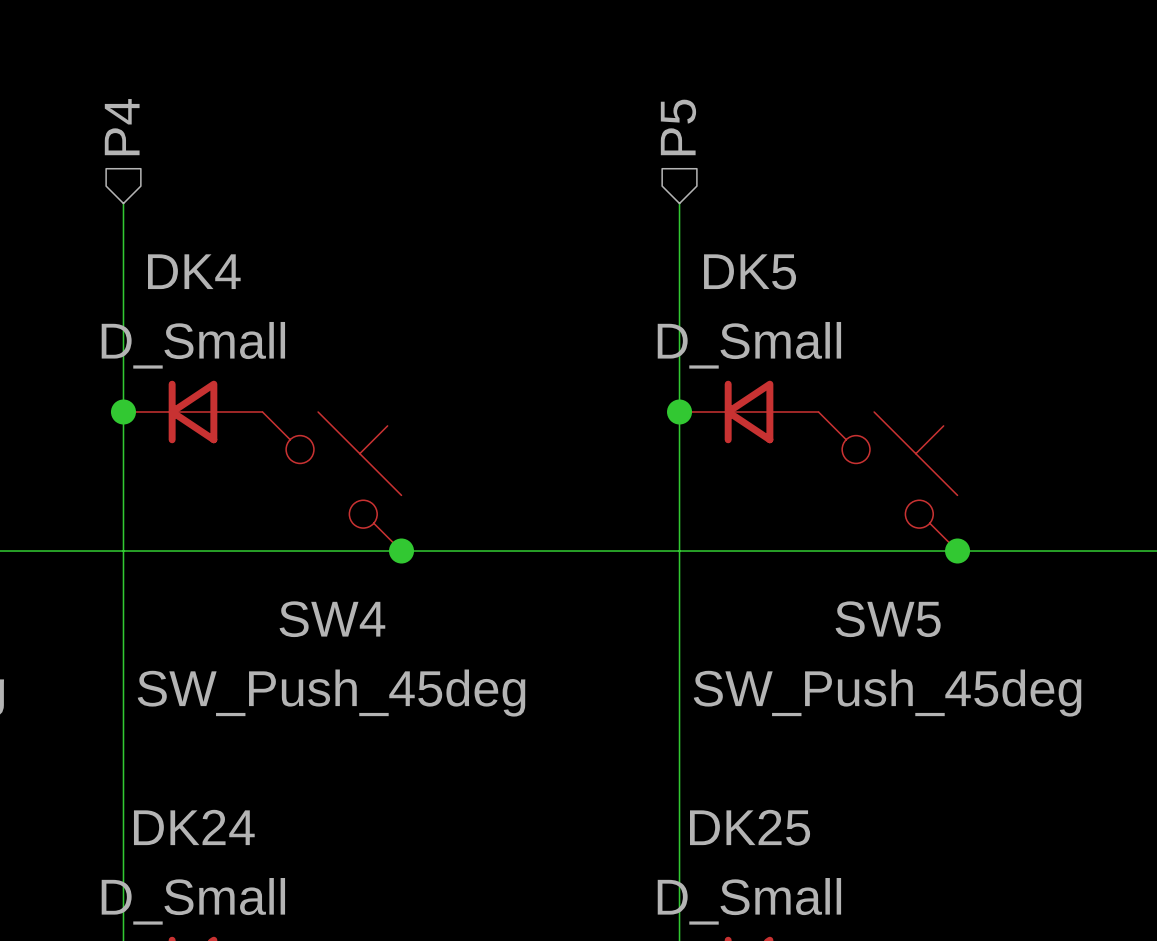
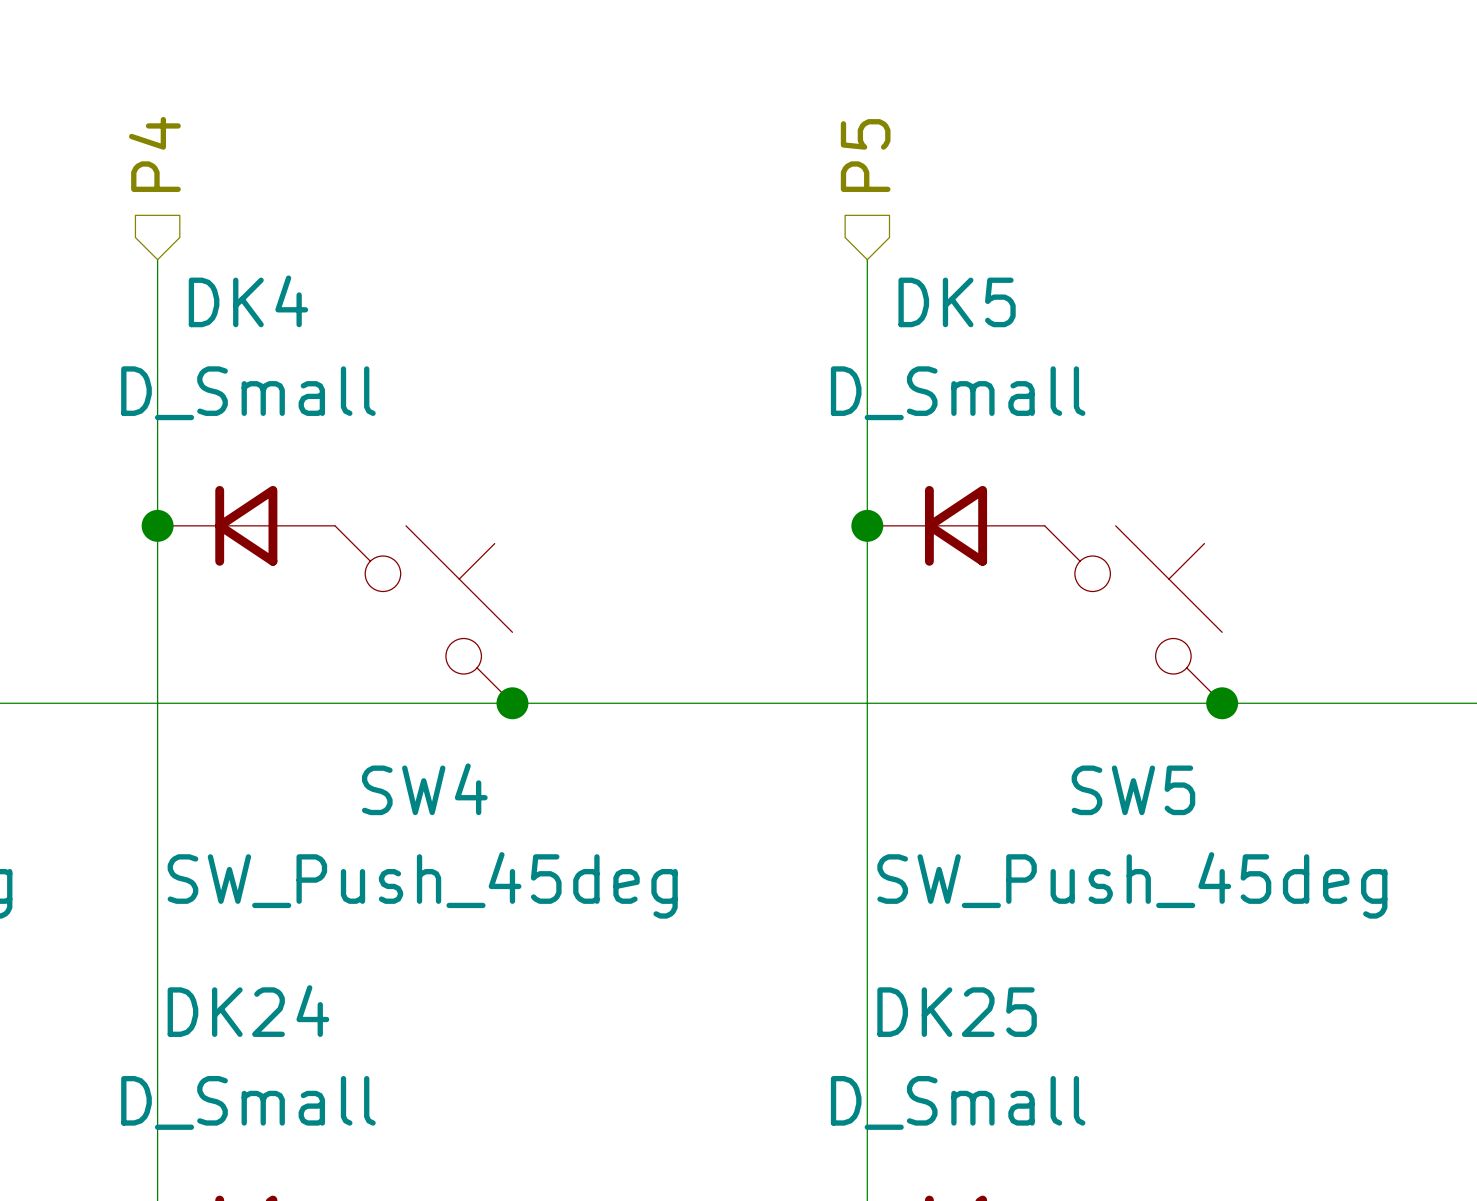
DK4 name position: DK4 (194, 271) -> DK4 (248, 301)
DK5 name position: DK5 (750, 271) -> DK5 (957, 302)
DK4 value position: D_Small (193, 345) -> D_Small (248, 393)
DK5 value position: D_Small (749, 345) -> D_Small (958, 393)
DK24 name position: DK24 (194, 827) -> DK24 (248, 1011)
DK25 name position: DK25 (750, 827) -> DK25 (957, 1012)
DK24 value position: D_Small (193, 901) -> D_Small (248, 1102)
DK25 value position: D_Small (749, 901) -> D_Small (958, 1102)

